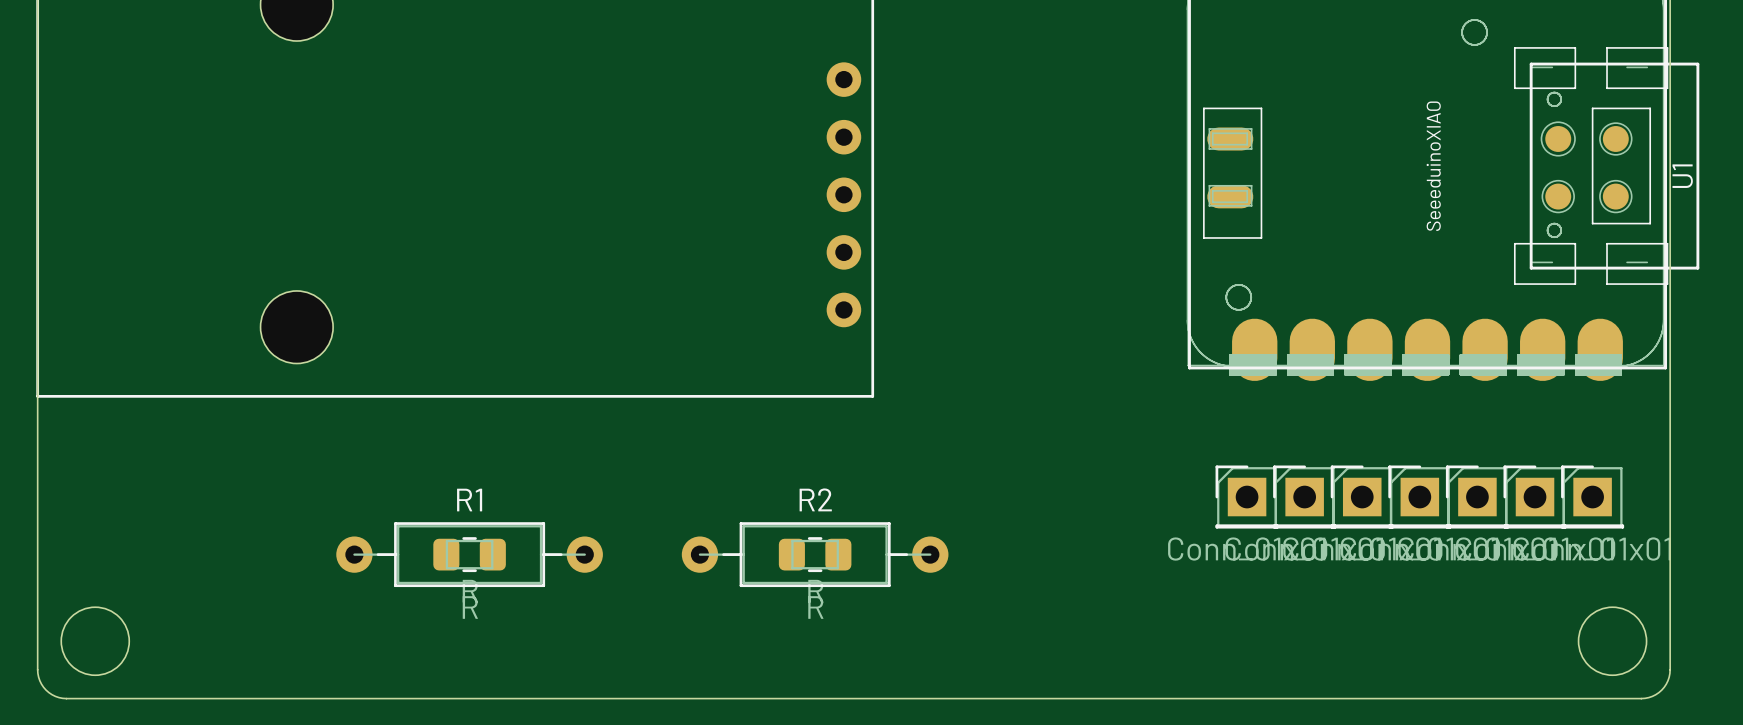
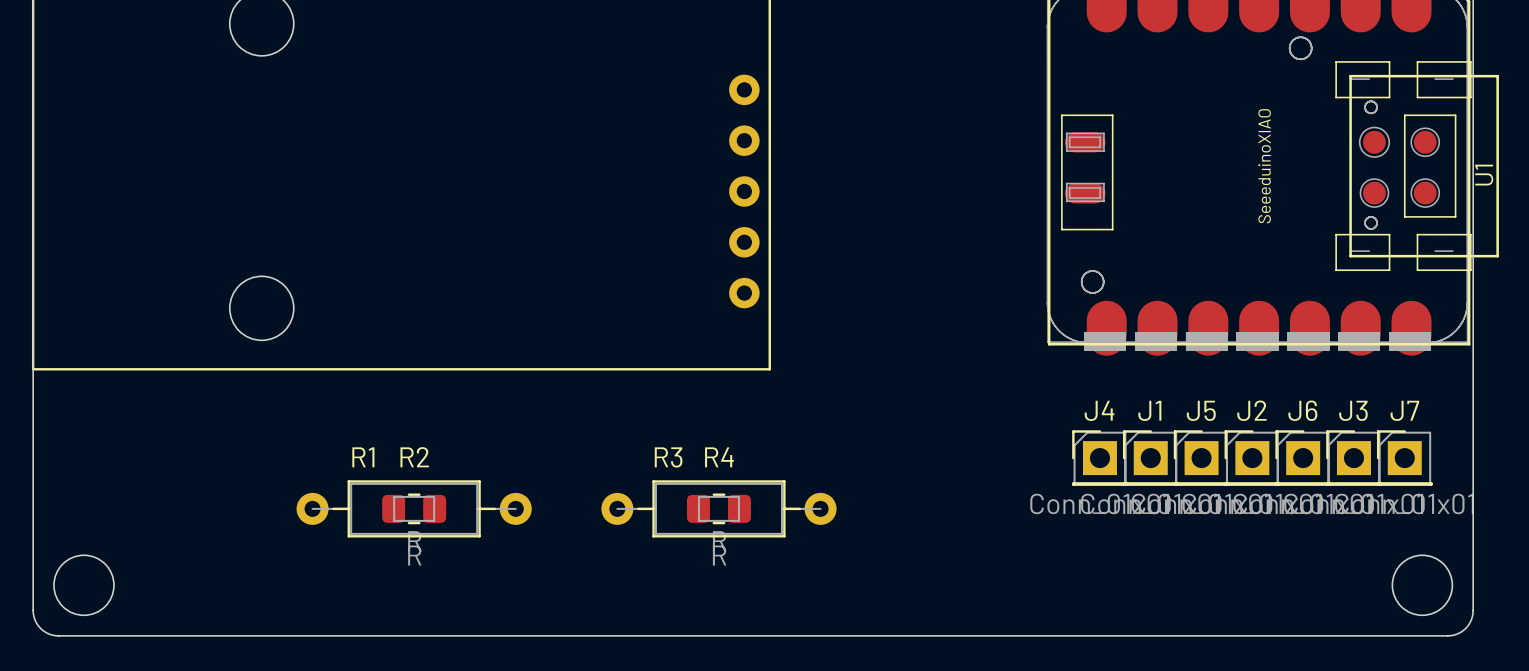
J4 name: none -> J4 (1099, 410)
J1 name: none -> J1 (1149, 410)
J5 name: none -> J5 (1201, 410)
J2 name: none -> J2 (1251, 410)
J6 name: none -> J6 (1302, 410)
J3 name: none -> J3 (1353, 410)
J7 name: none -> J7 (1404, 410)
R2 name: none -> R2 (414, 457)
R4 name: none -> R4 (719, 457)
R2 name: R2 (815, 499) -> R3 (668, 457)
R1 name position: R1 (469, 500) -> R1 (363, 457)

